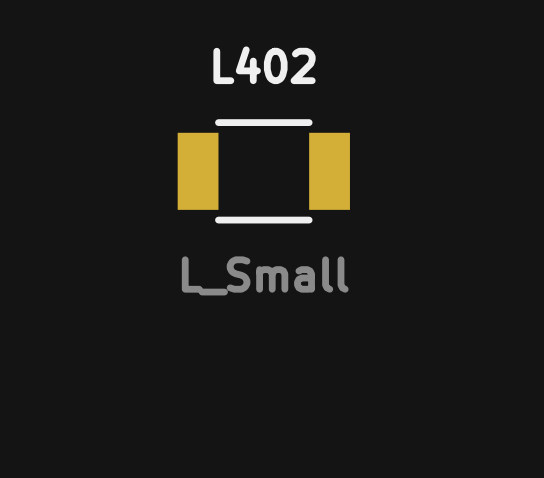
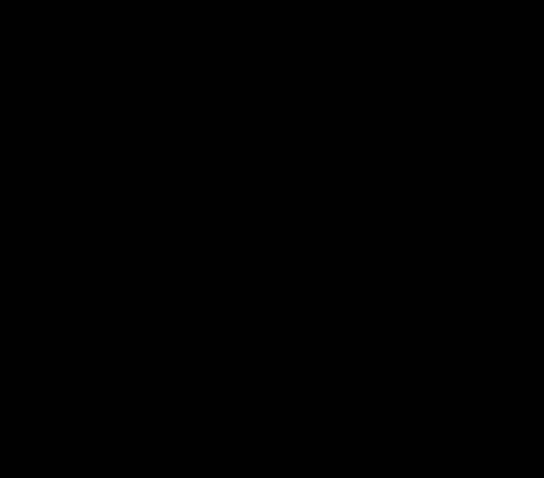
L402: L_Small (263, 171) -> none

